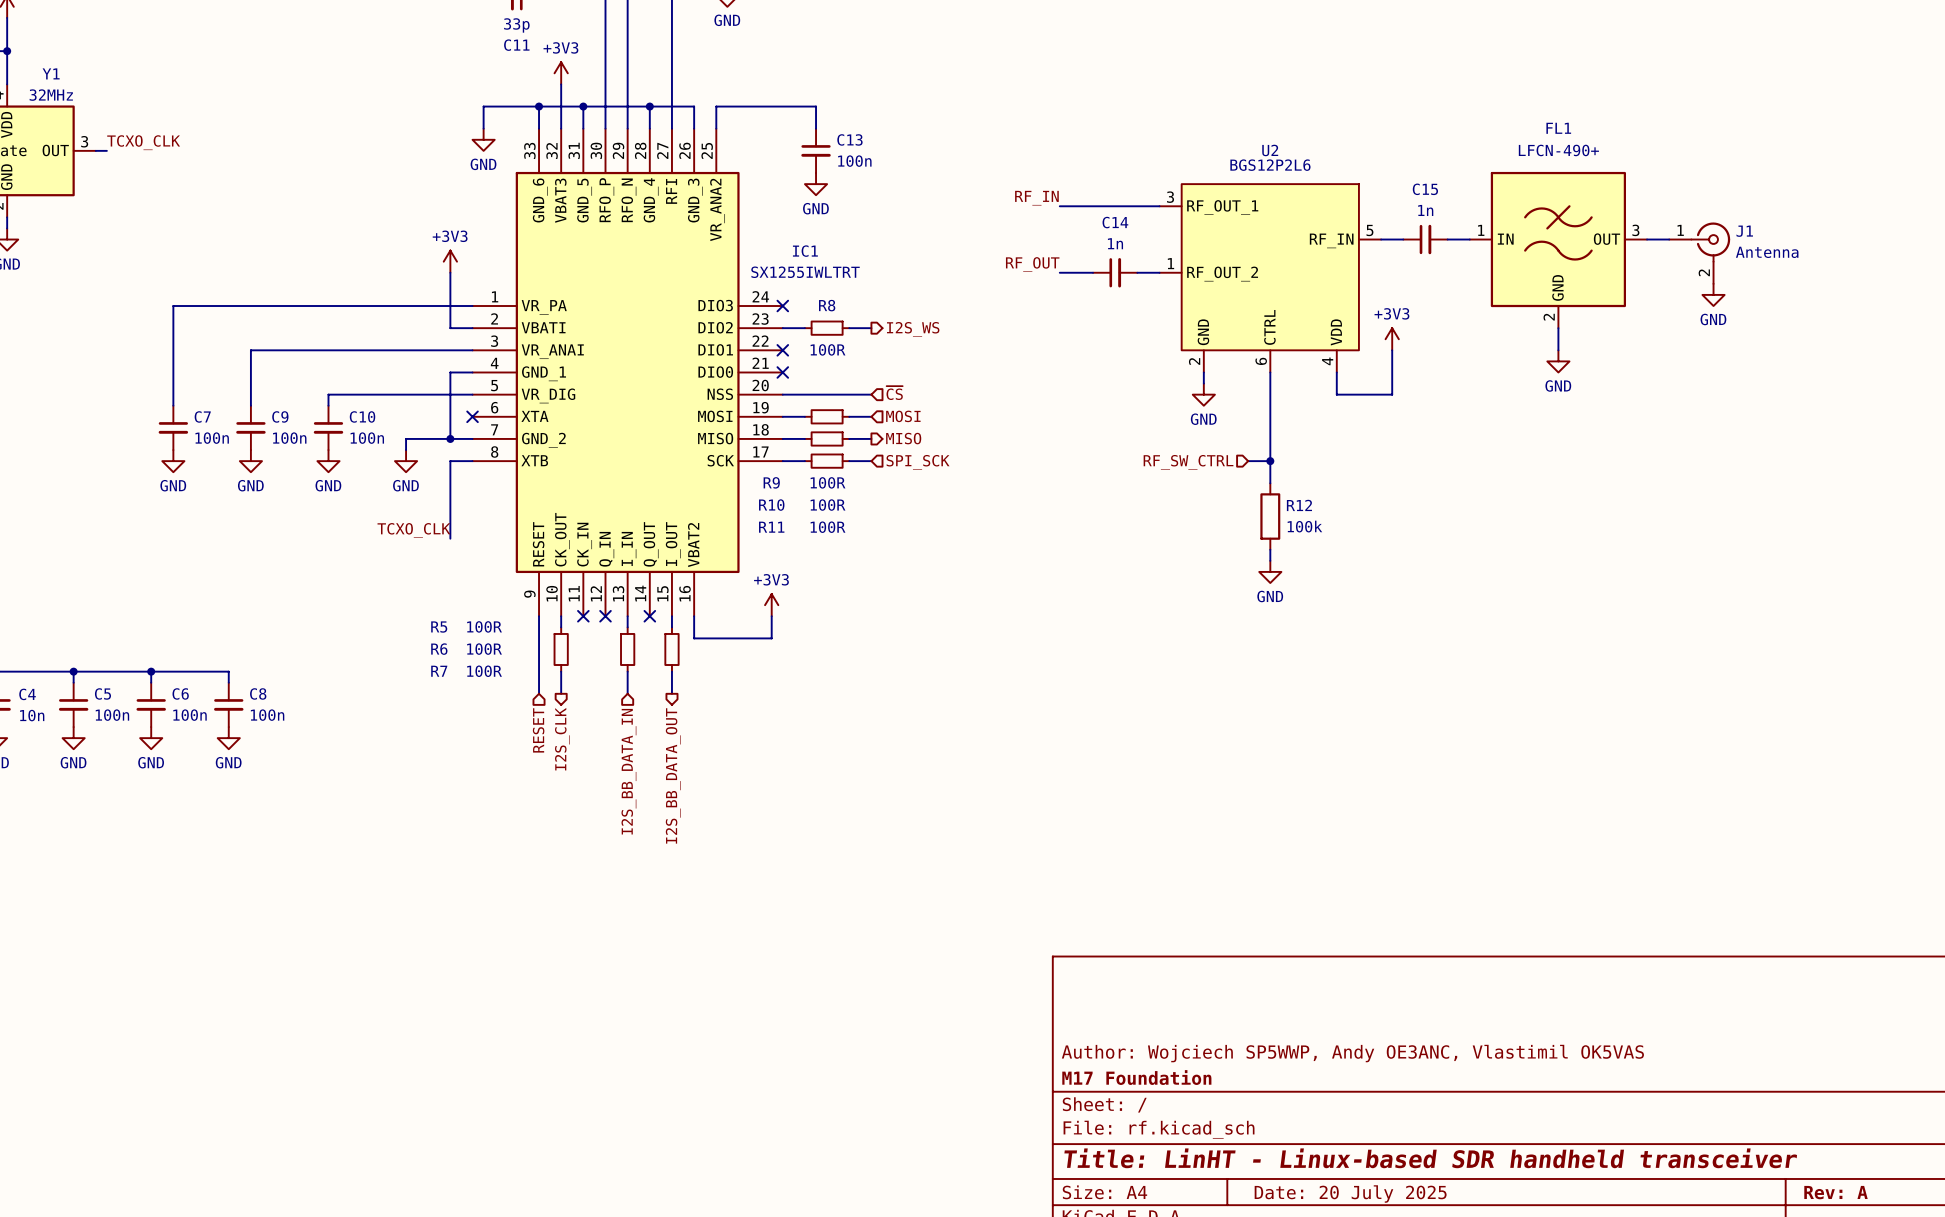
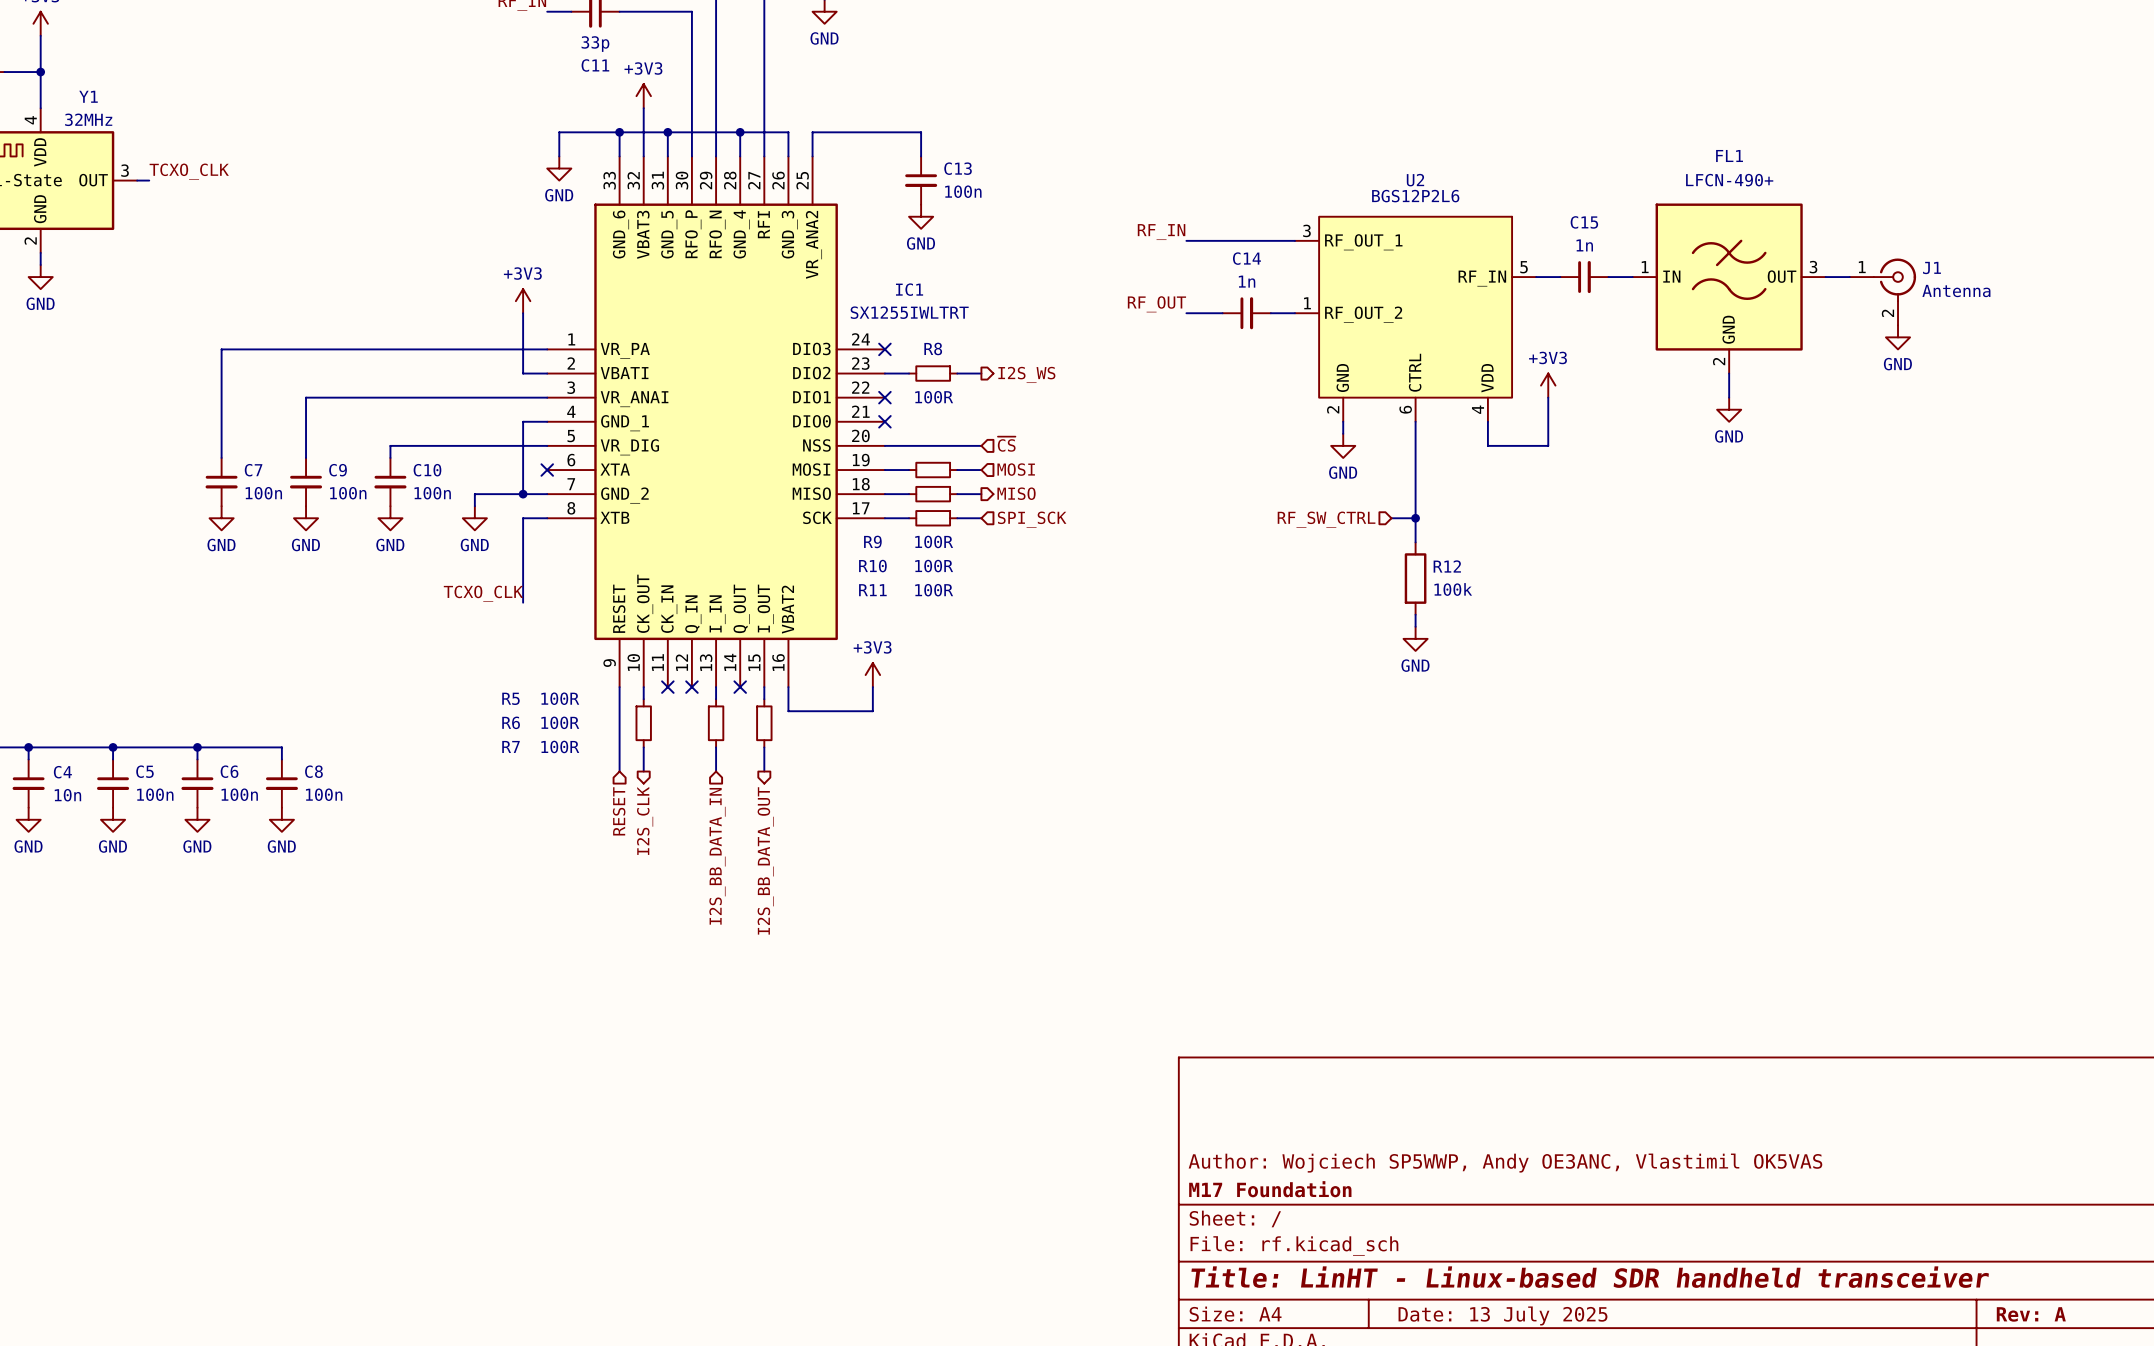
title block: Date: 20 July 2025 (1350, 1194) -> Date: 13 July 2025 (1503, 1315)

